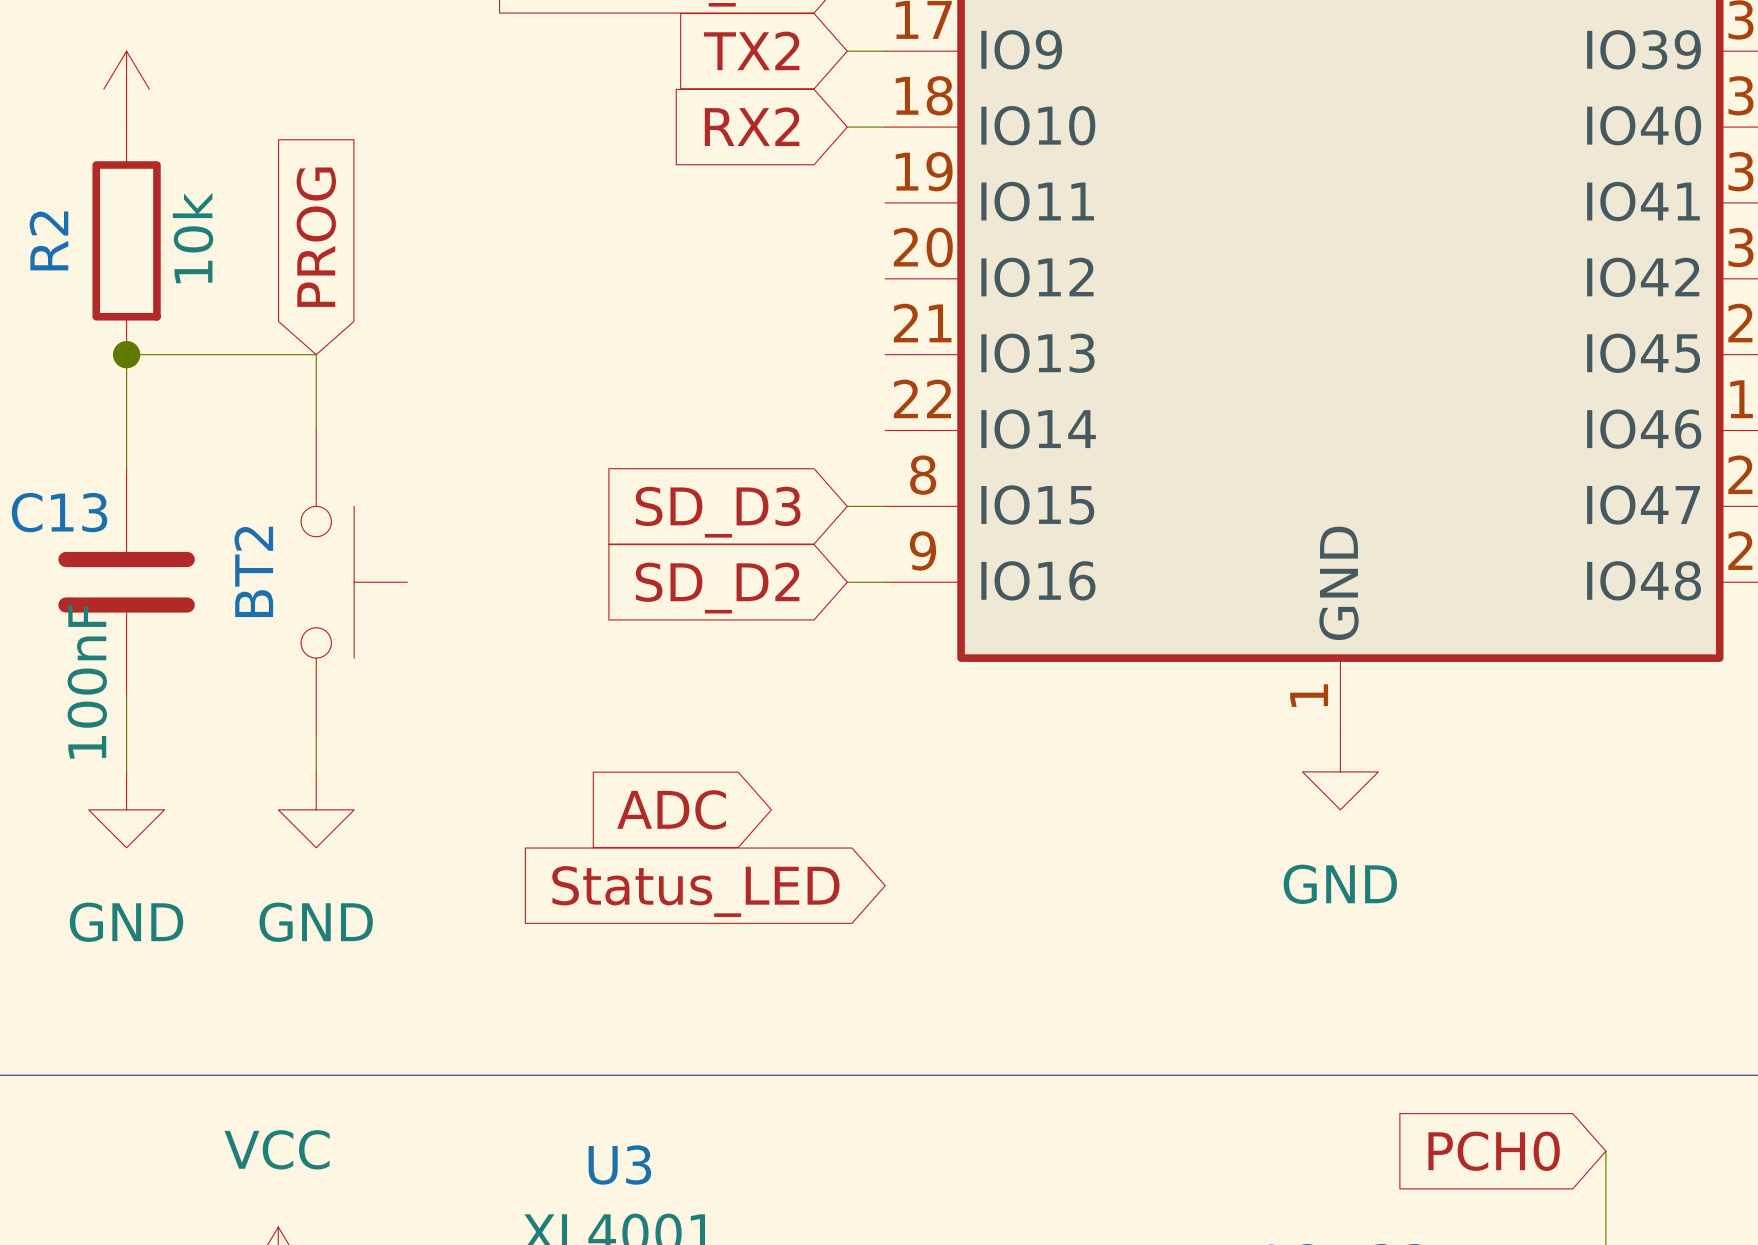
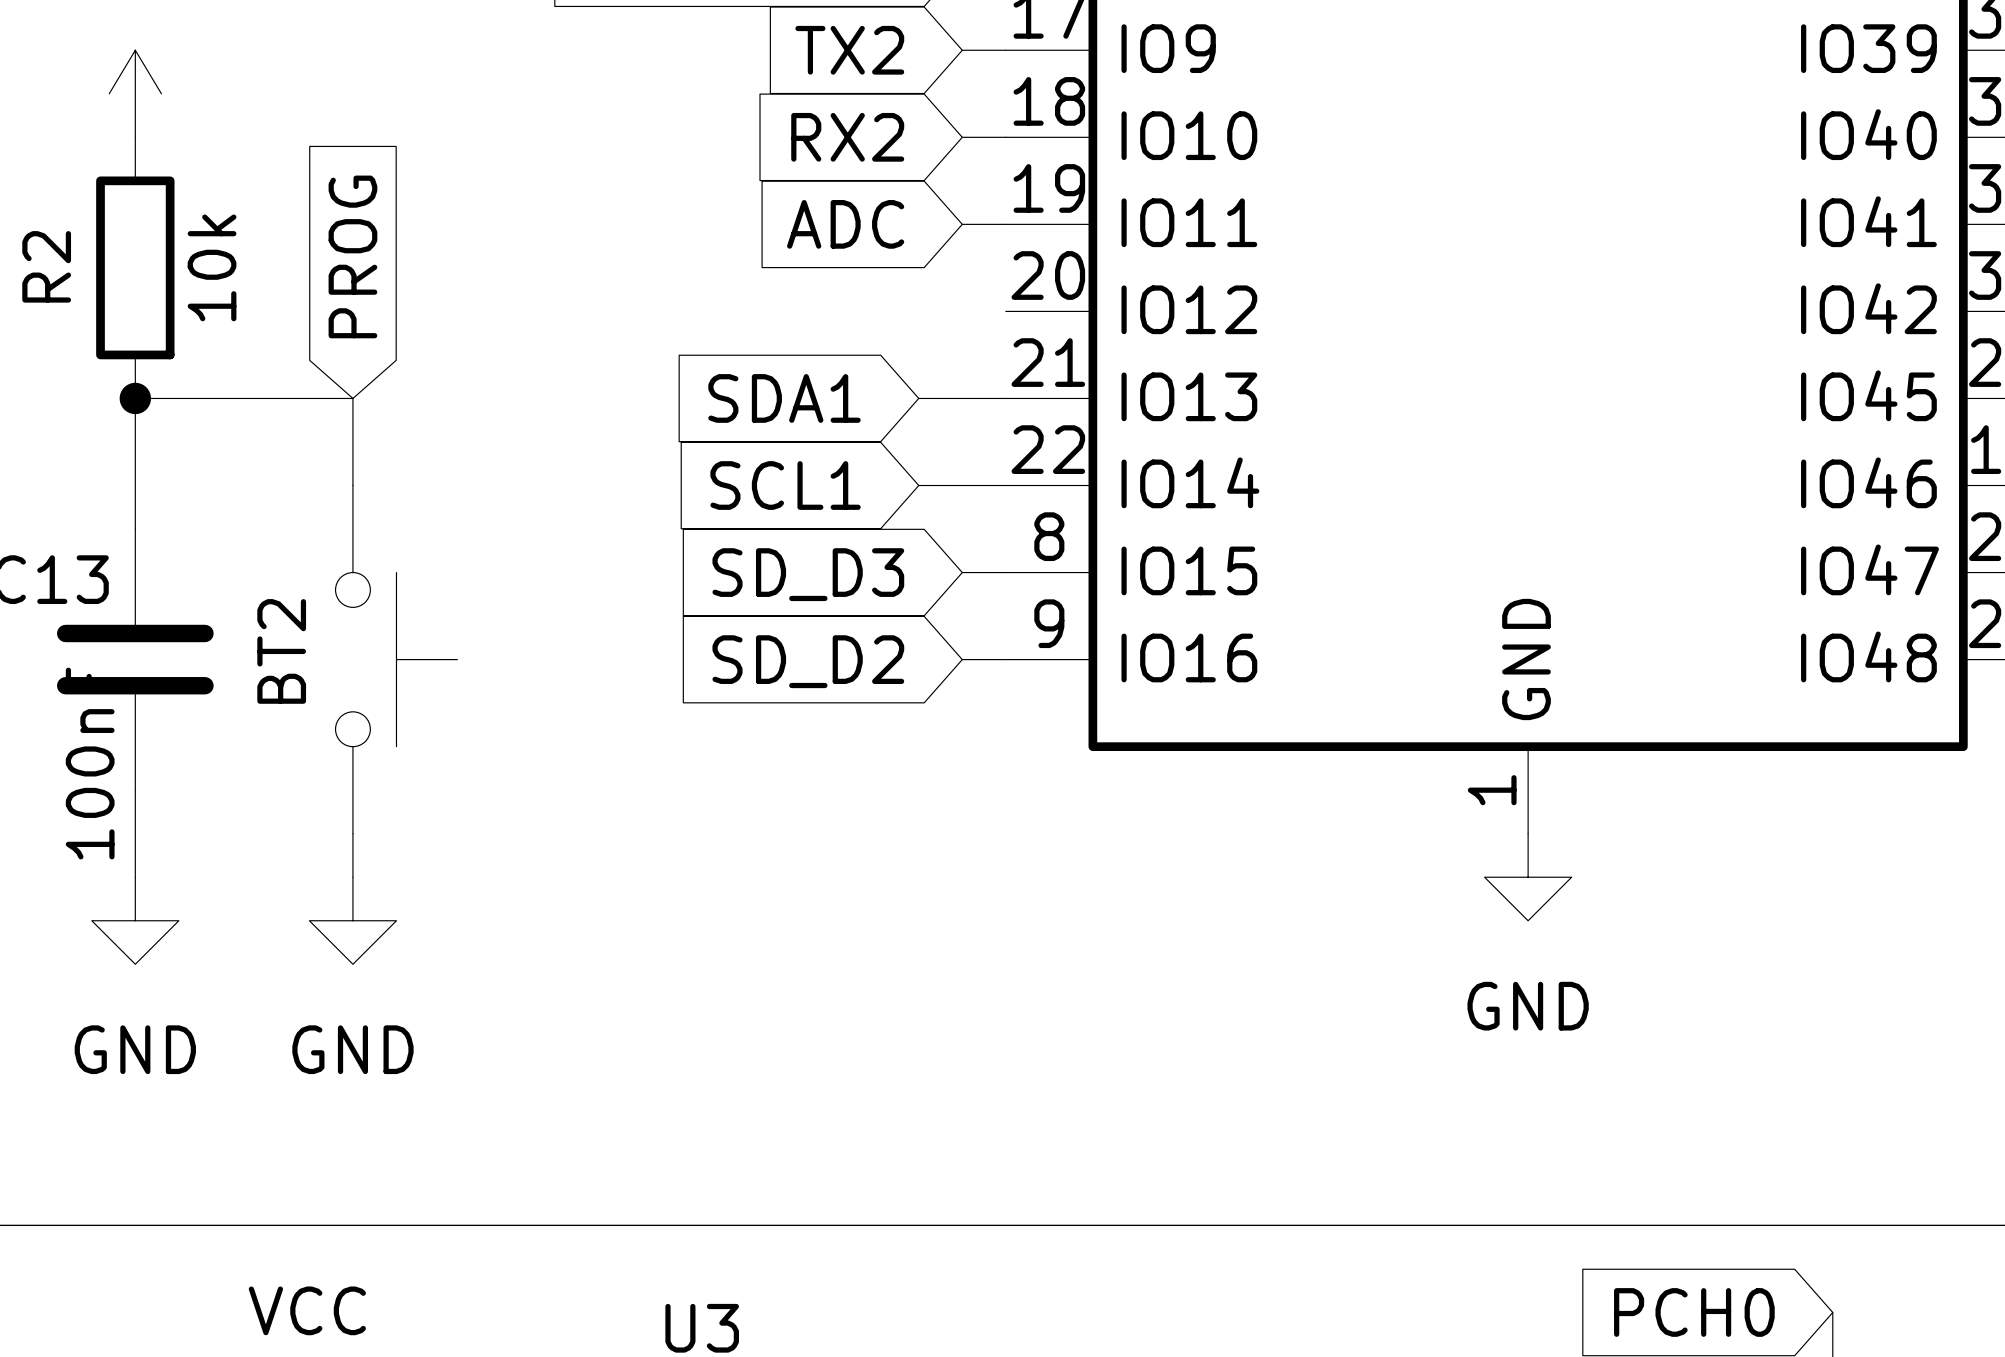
wire: none -> (962, 224) (1005, 224)
global label: none -> SDA1 (784, 398)
wire: none -> (918, 398) (1005, 398)
global label: none -> SCL1 (785, 485)
wire: none -> (918, 485) (1005, 485)
global label position: ADC (671, 809) -> ADC (845, 224)
global label: Status_LED (695, 891) -> none

